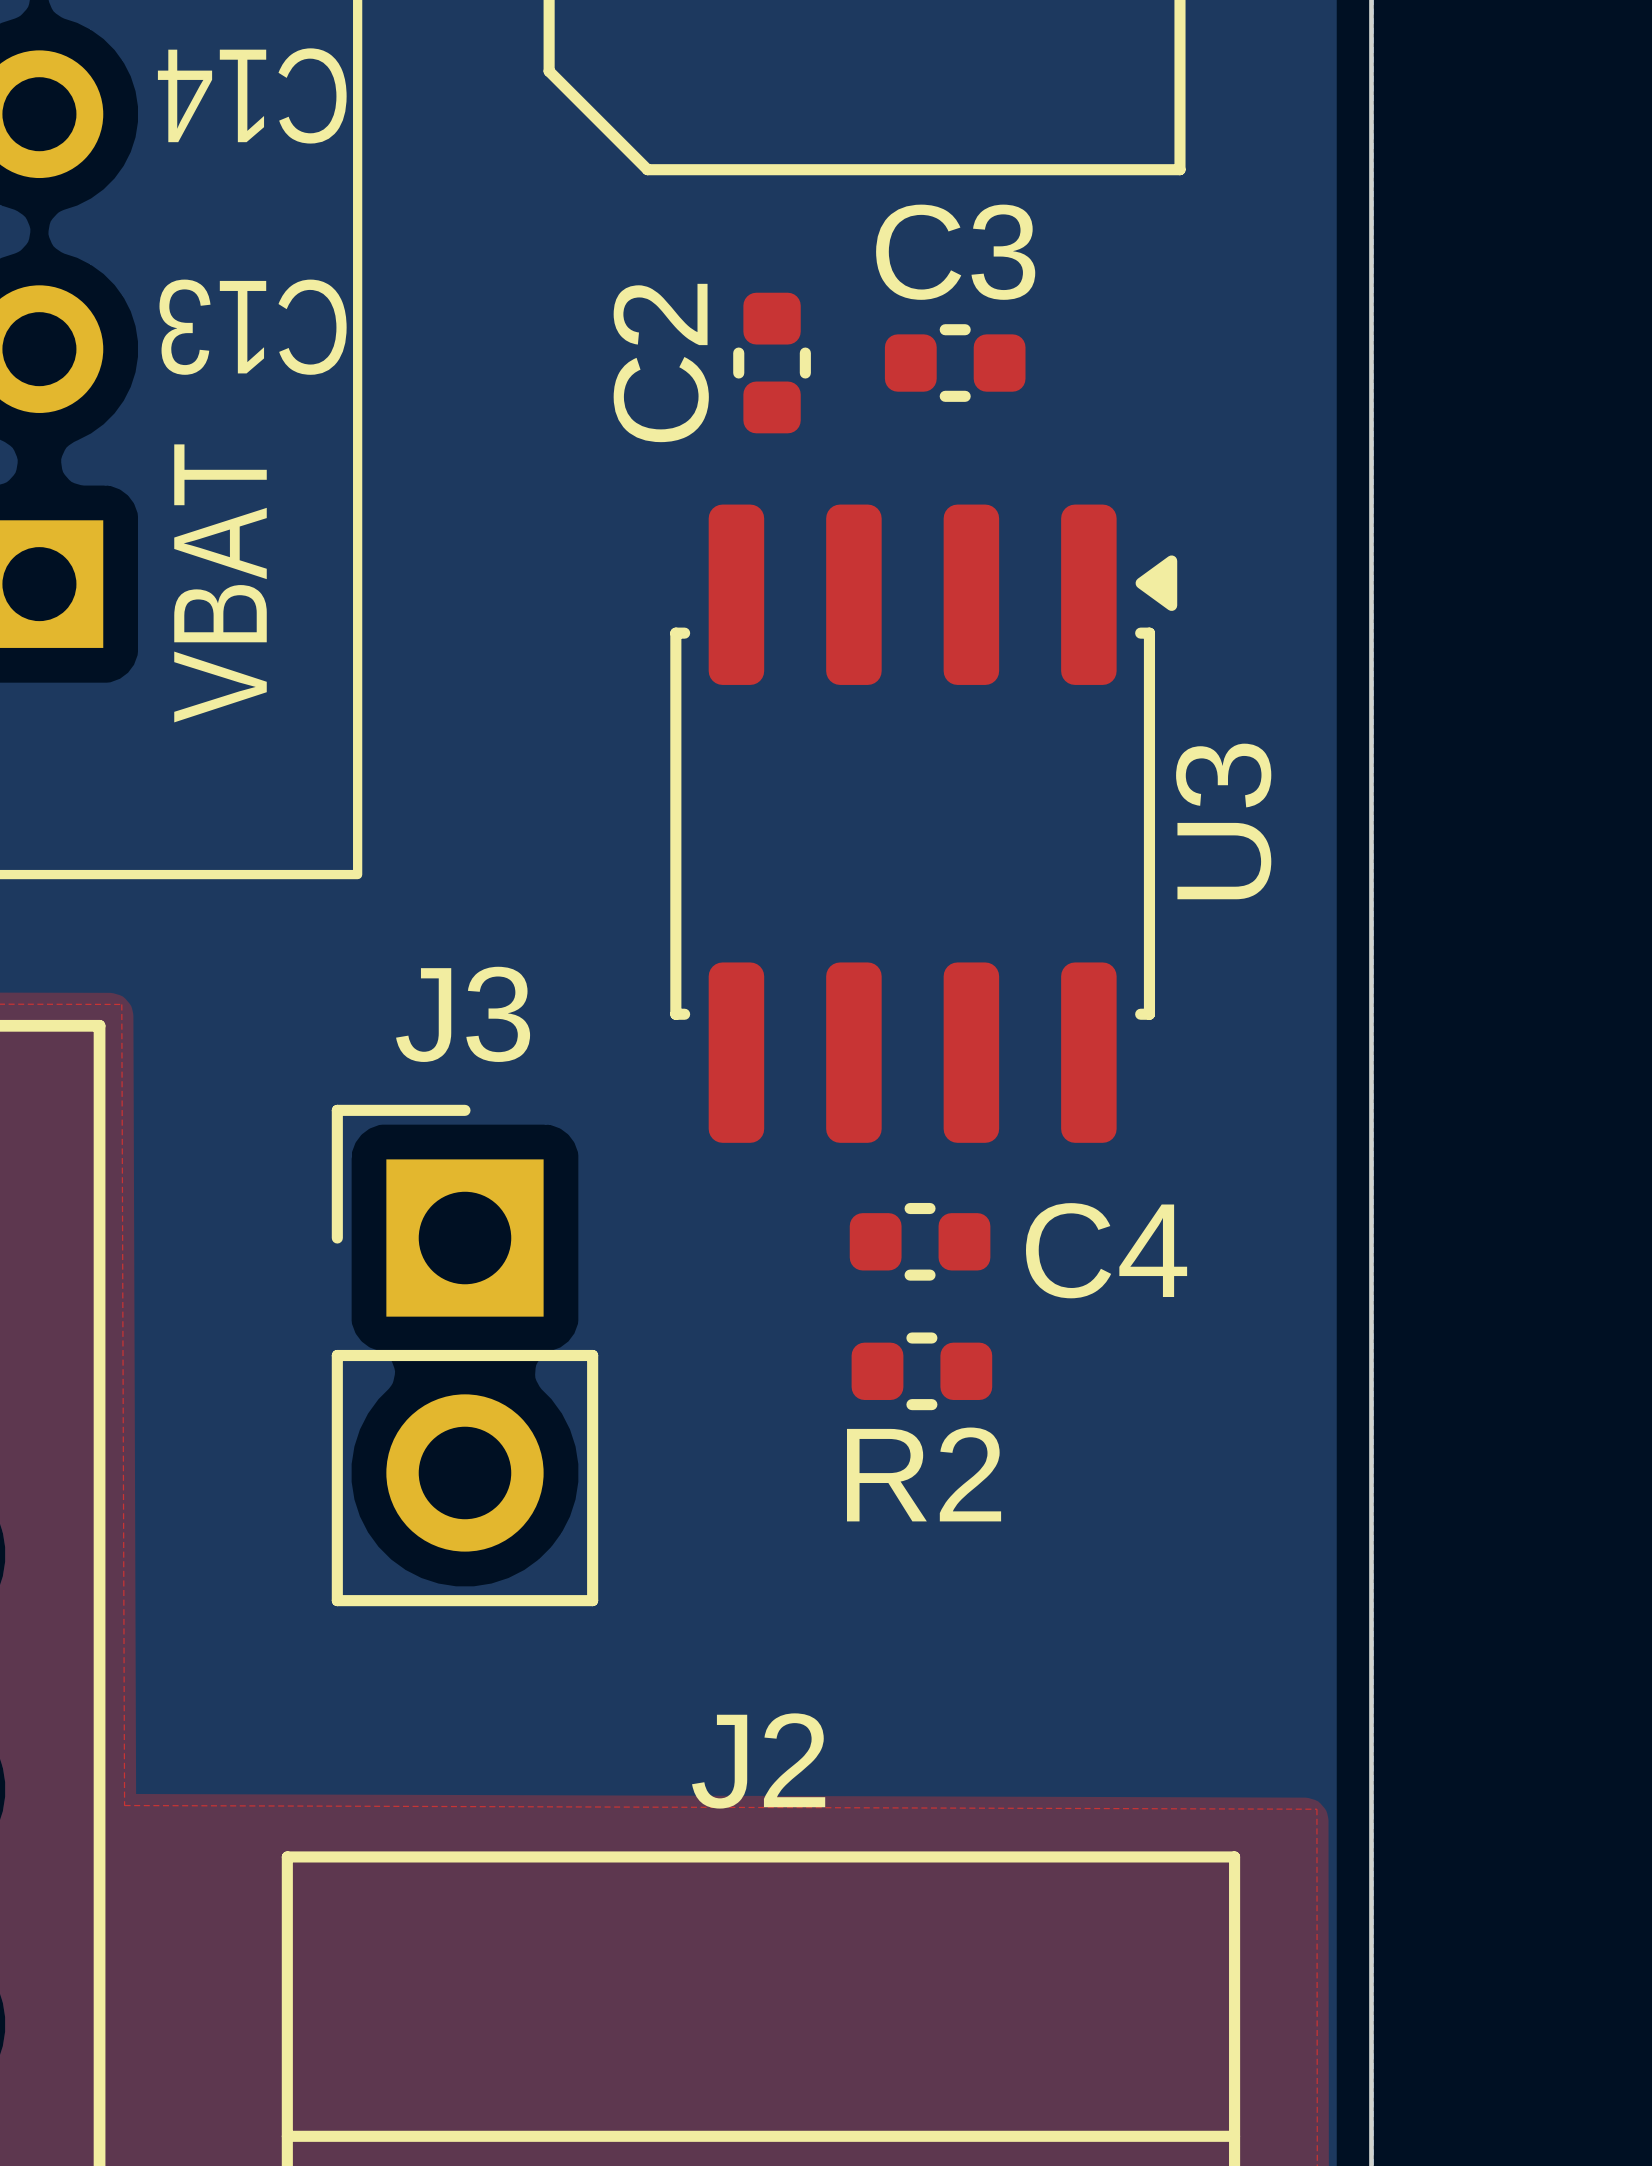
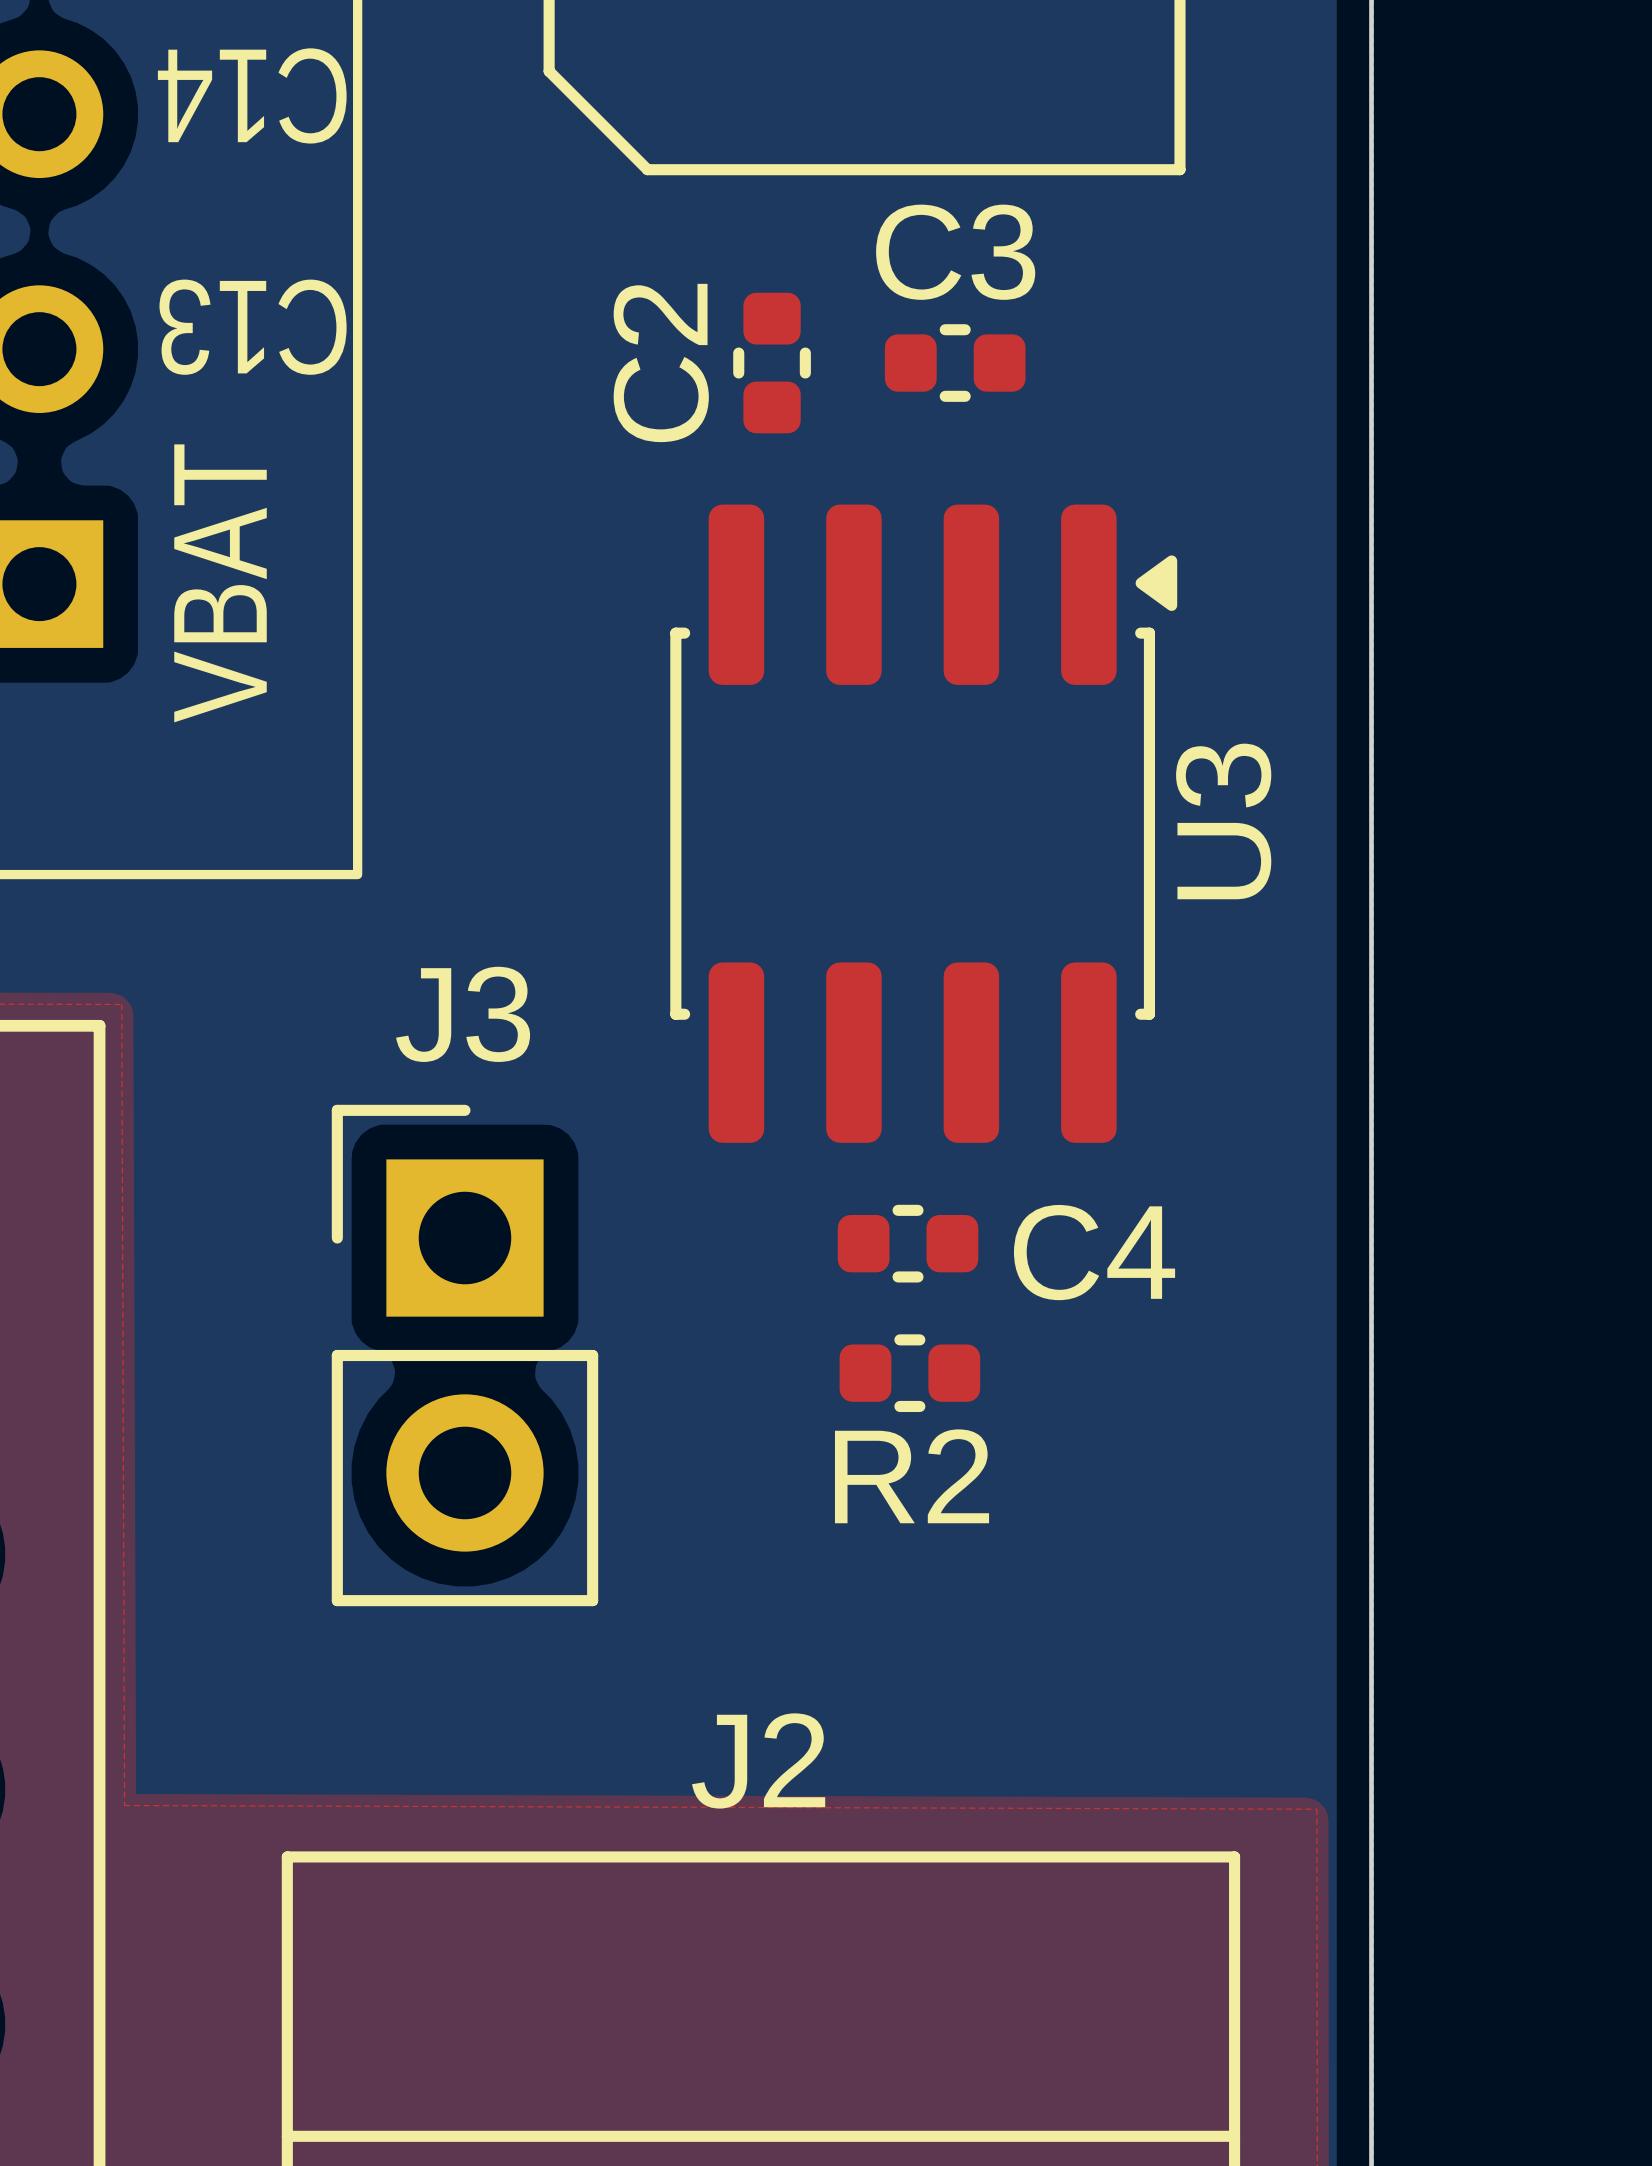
C4 position: (920, 1241) -> (908, 1243)
R2 position: (921, 1371) -> (909, 1373)

